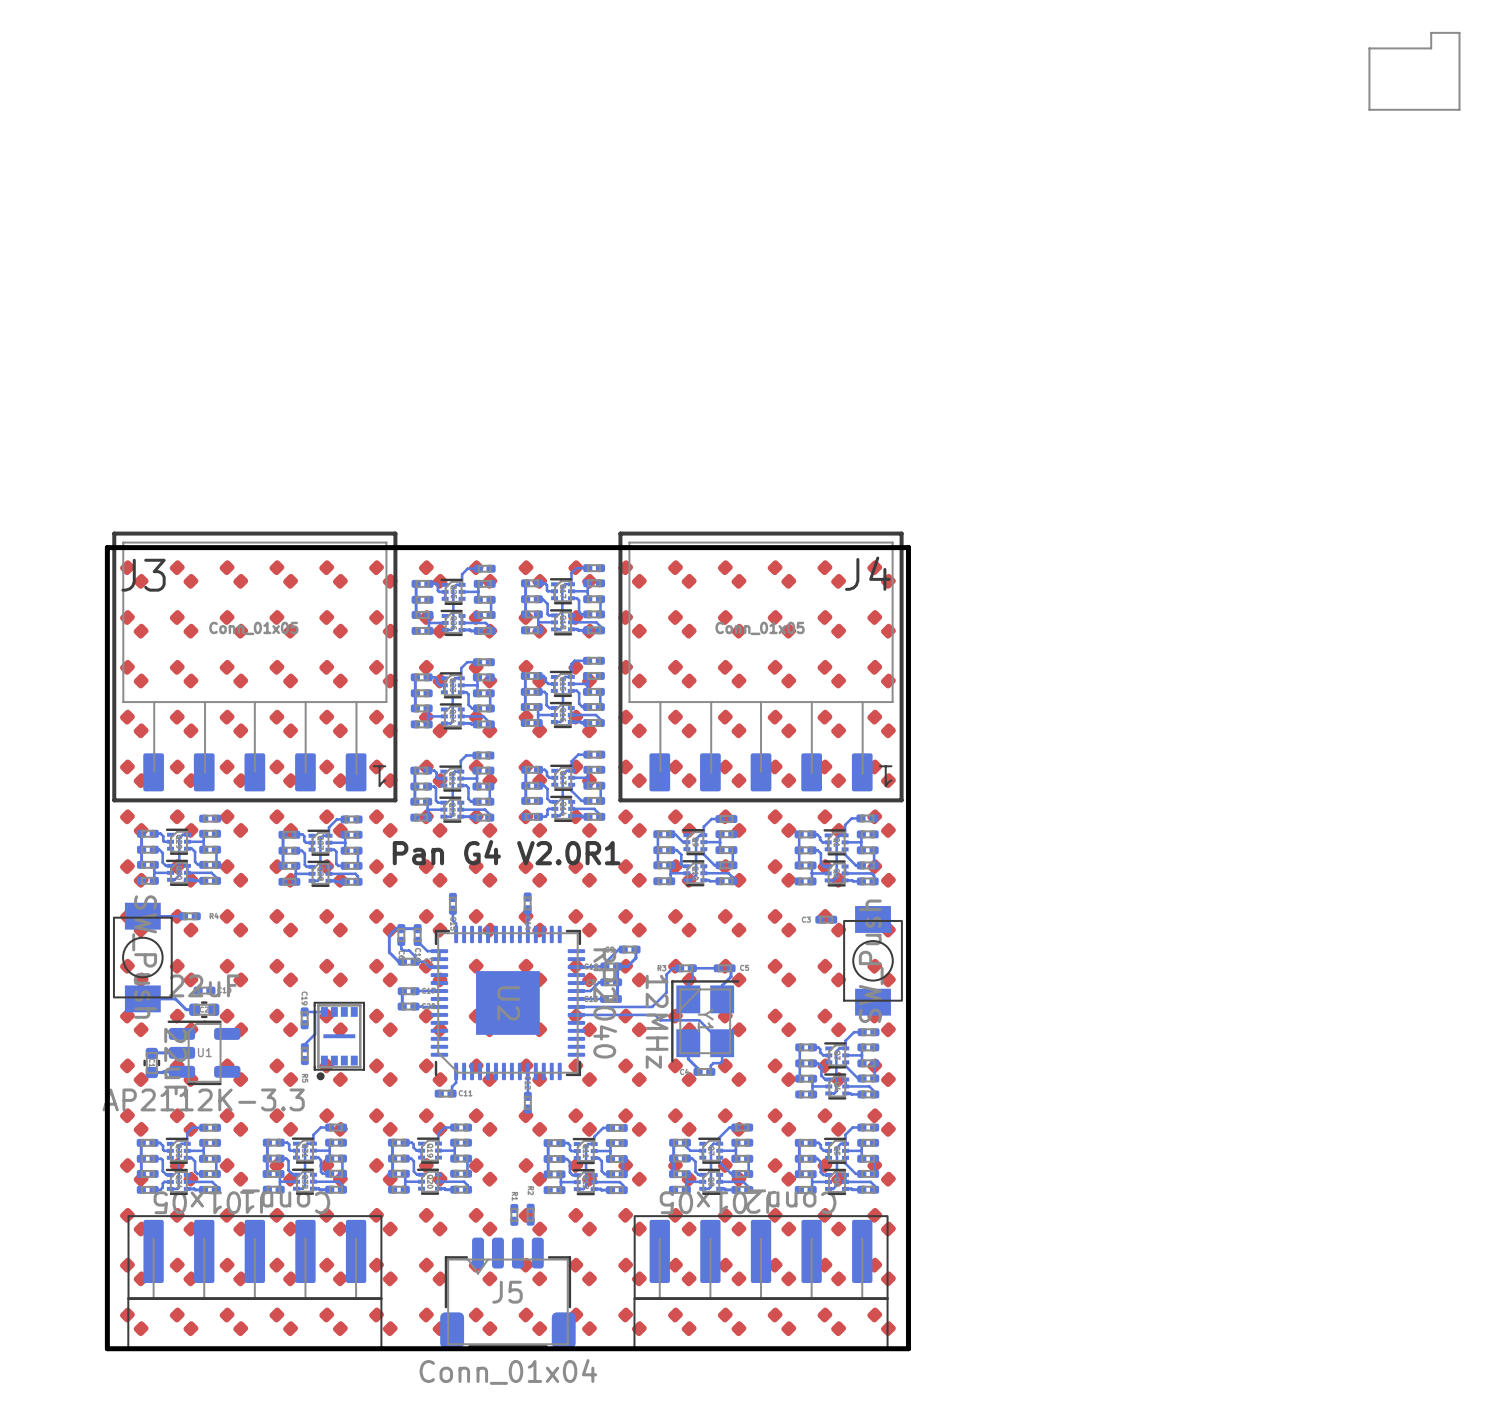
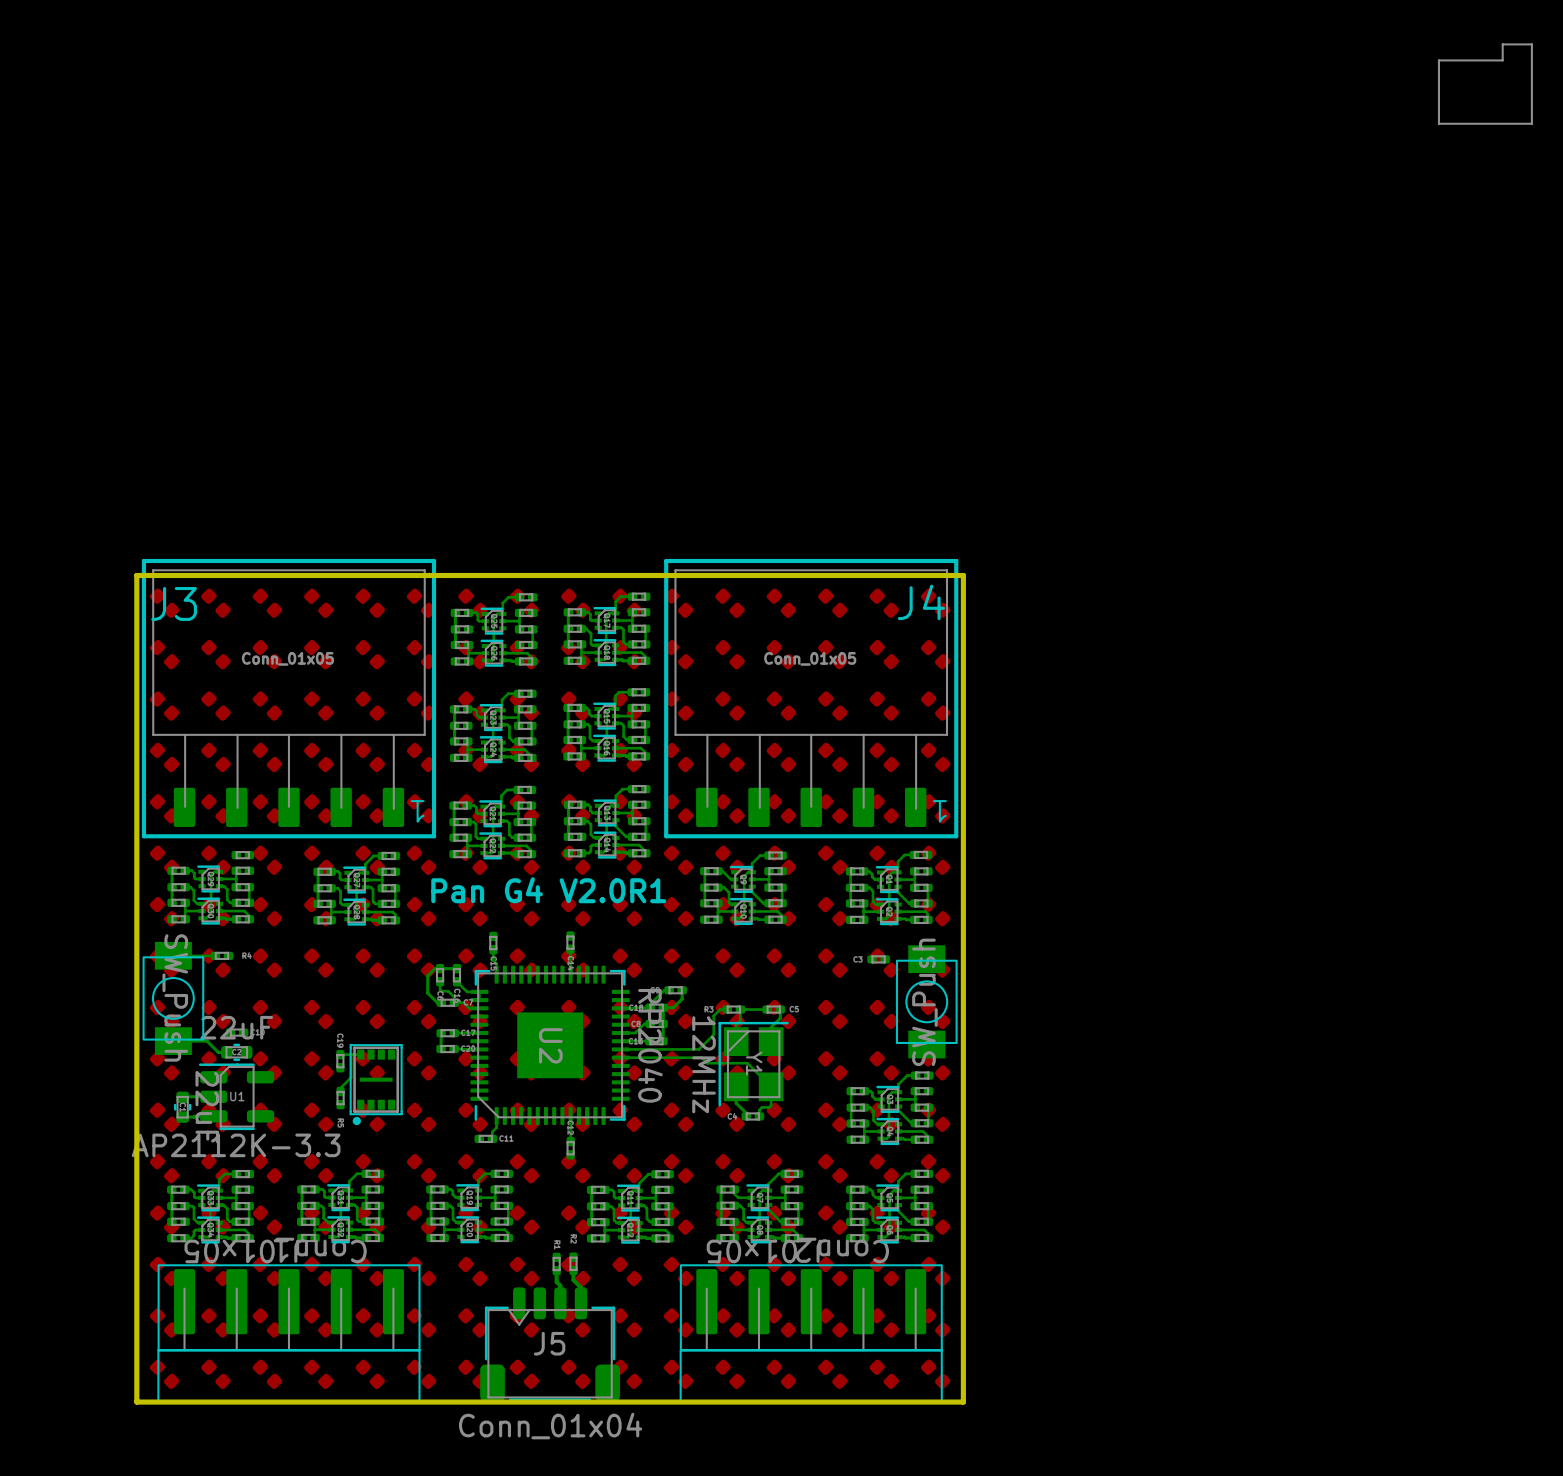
bottom track: none -> (556, 1270) (556, 1281) (560, 1285) (560, 1303)
bottom track: none -> (573, 1270) (573, 1280) (580, 1287) (580, 1303)

